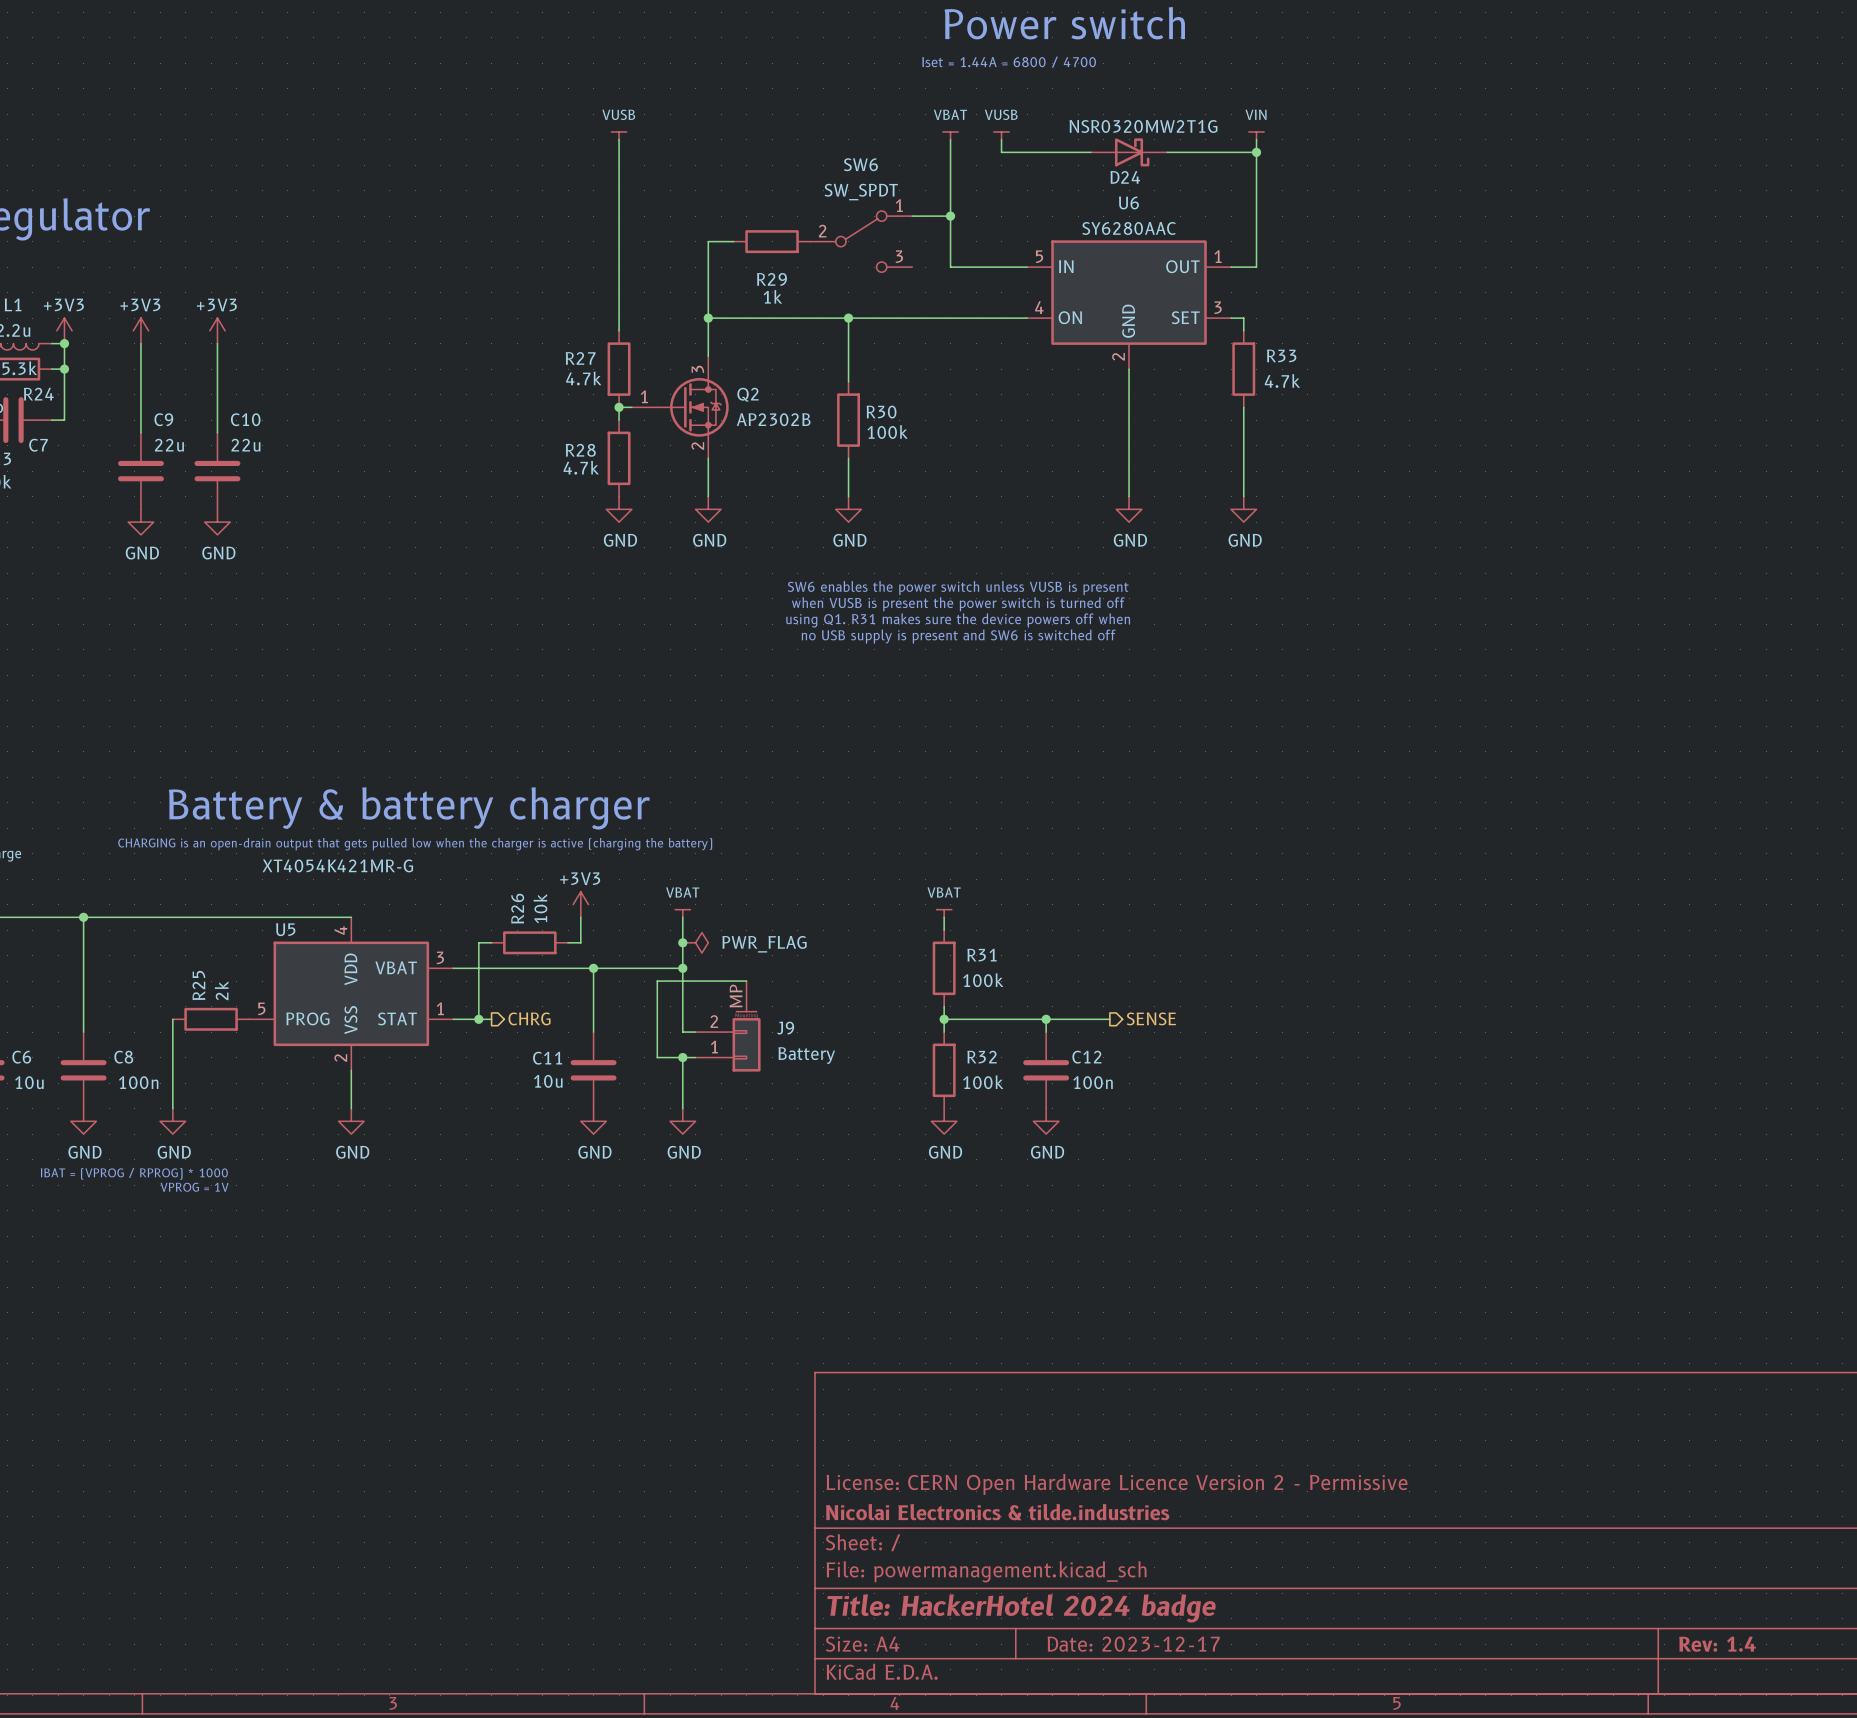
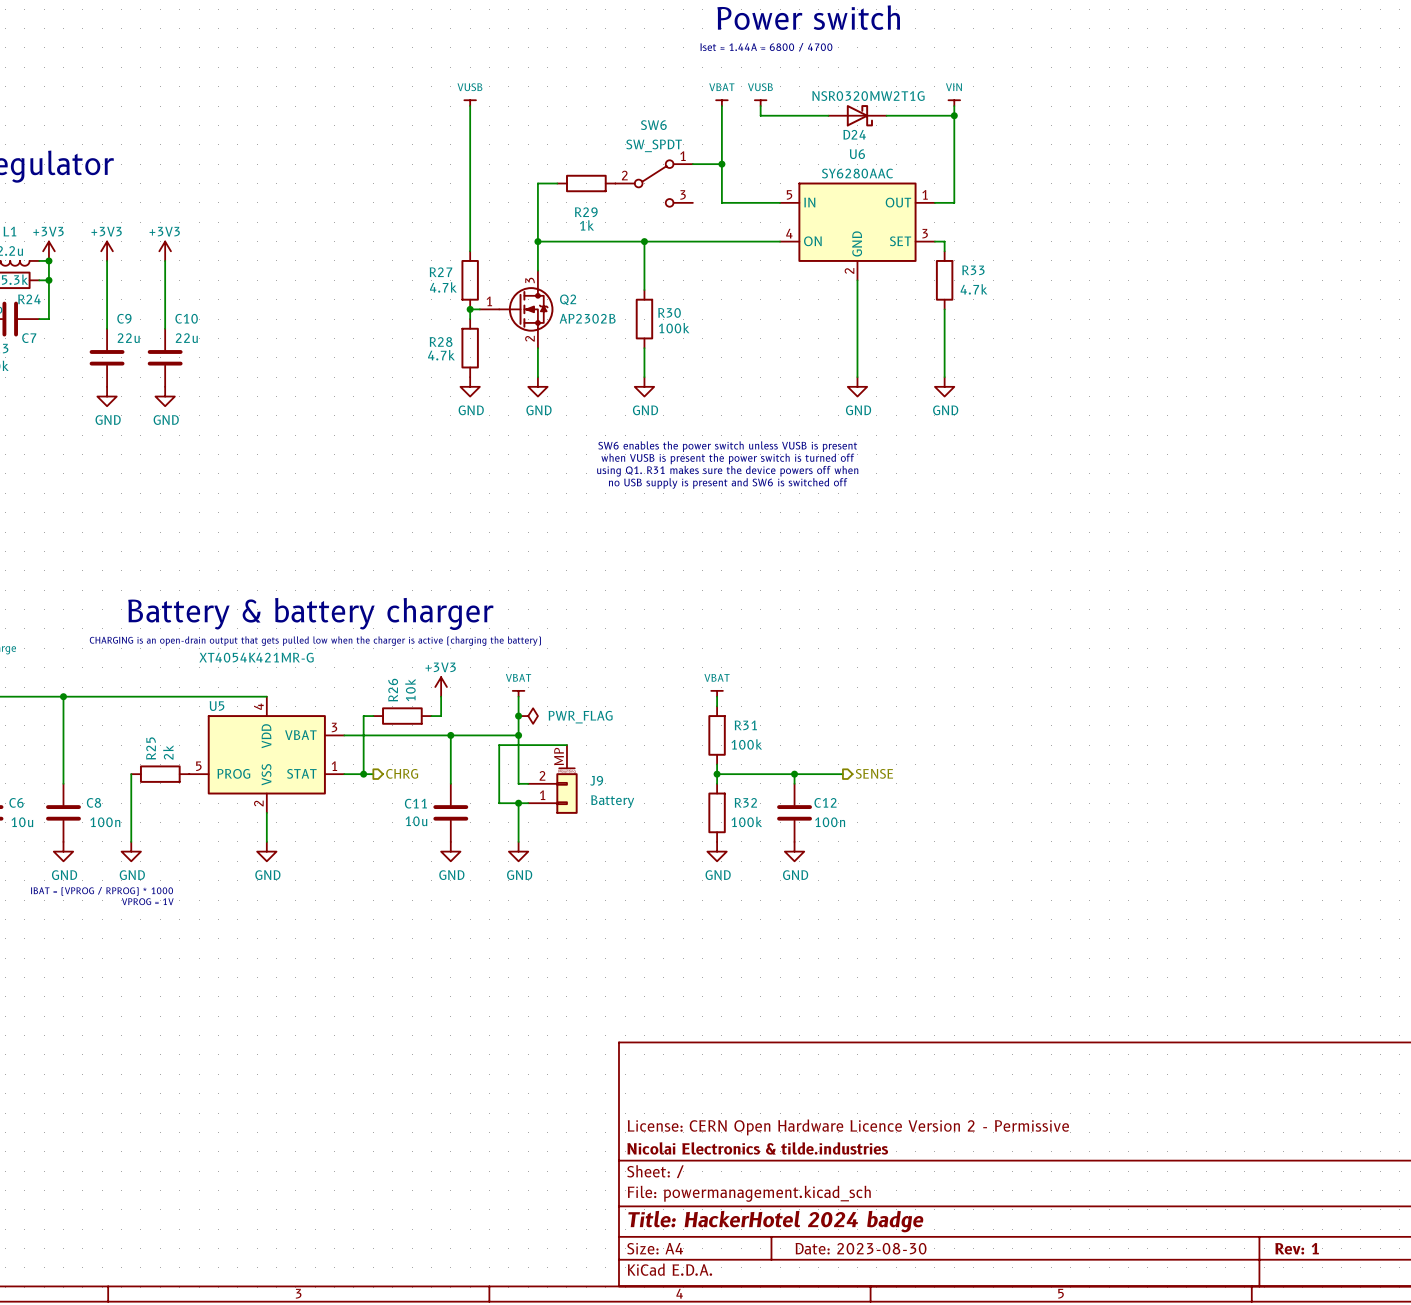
title block: Date: 2023-12-17 (1133, 1644) -> Date: 2023-08-30 (861, 1248)
title block: Rev: 1.4 (1717, 1644) -> Rev: 1 (1297, 1248)

